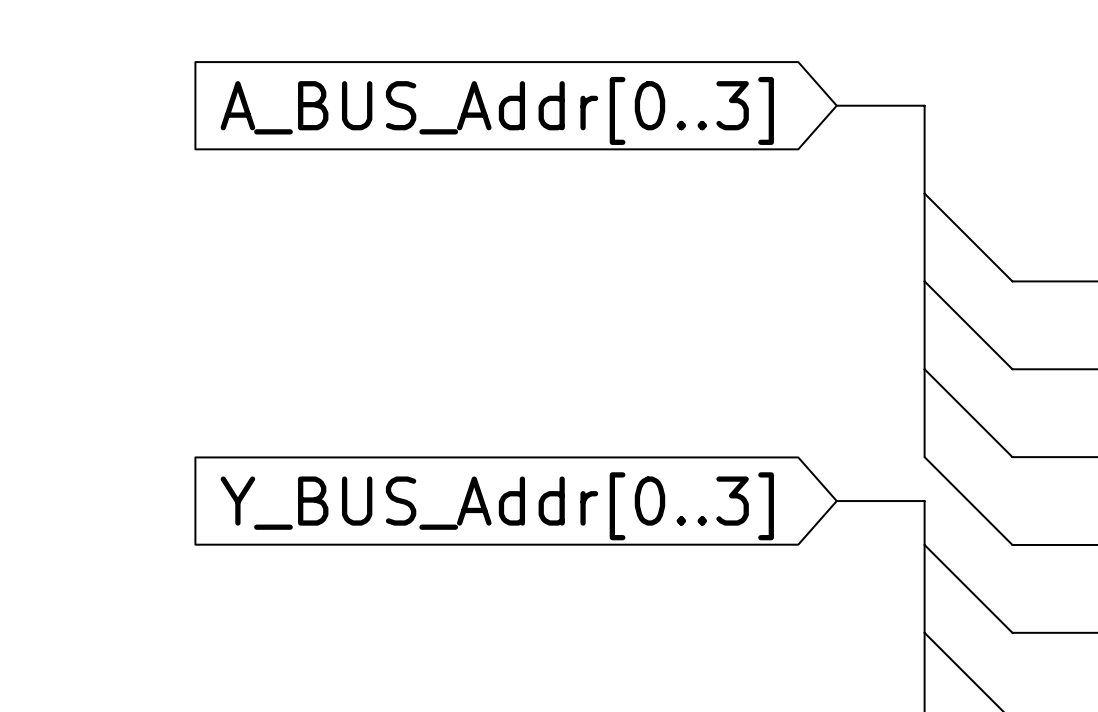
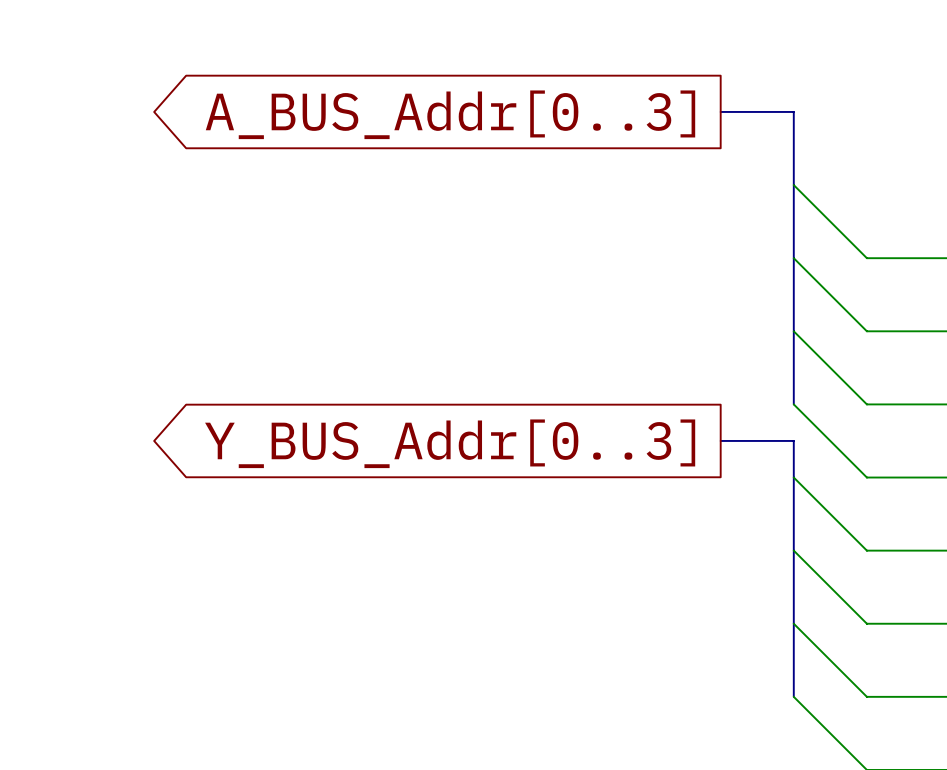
global label shape: input (497, 110) -> output (450, 114)
global label shape: input (497, 506) -> output (450, 443)

